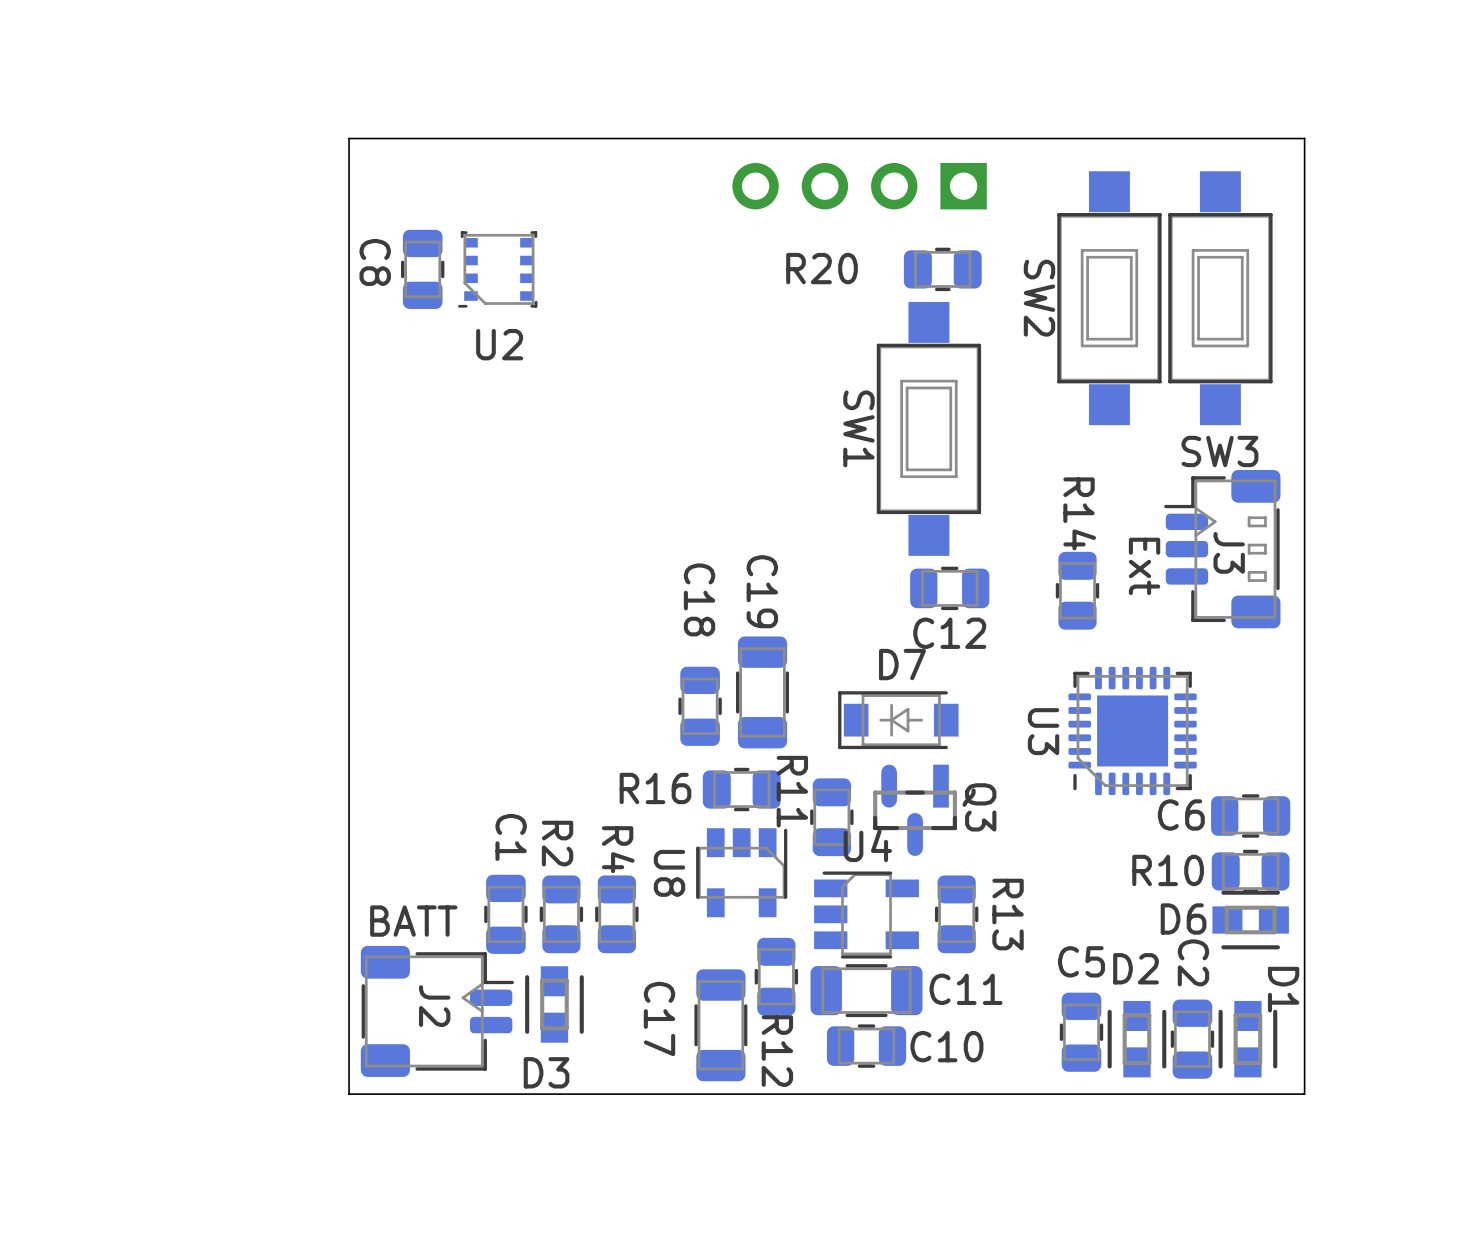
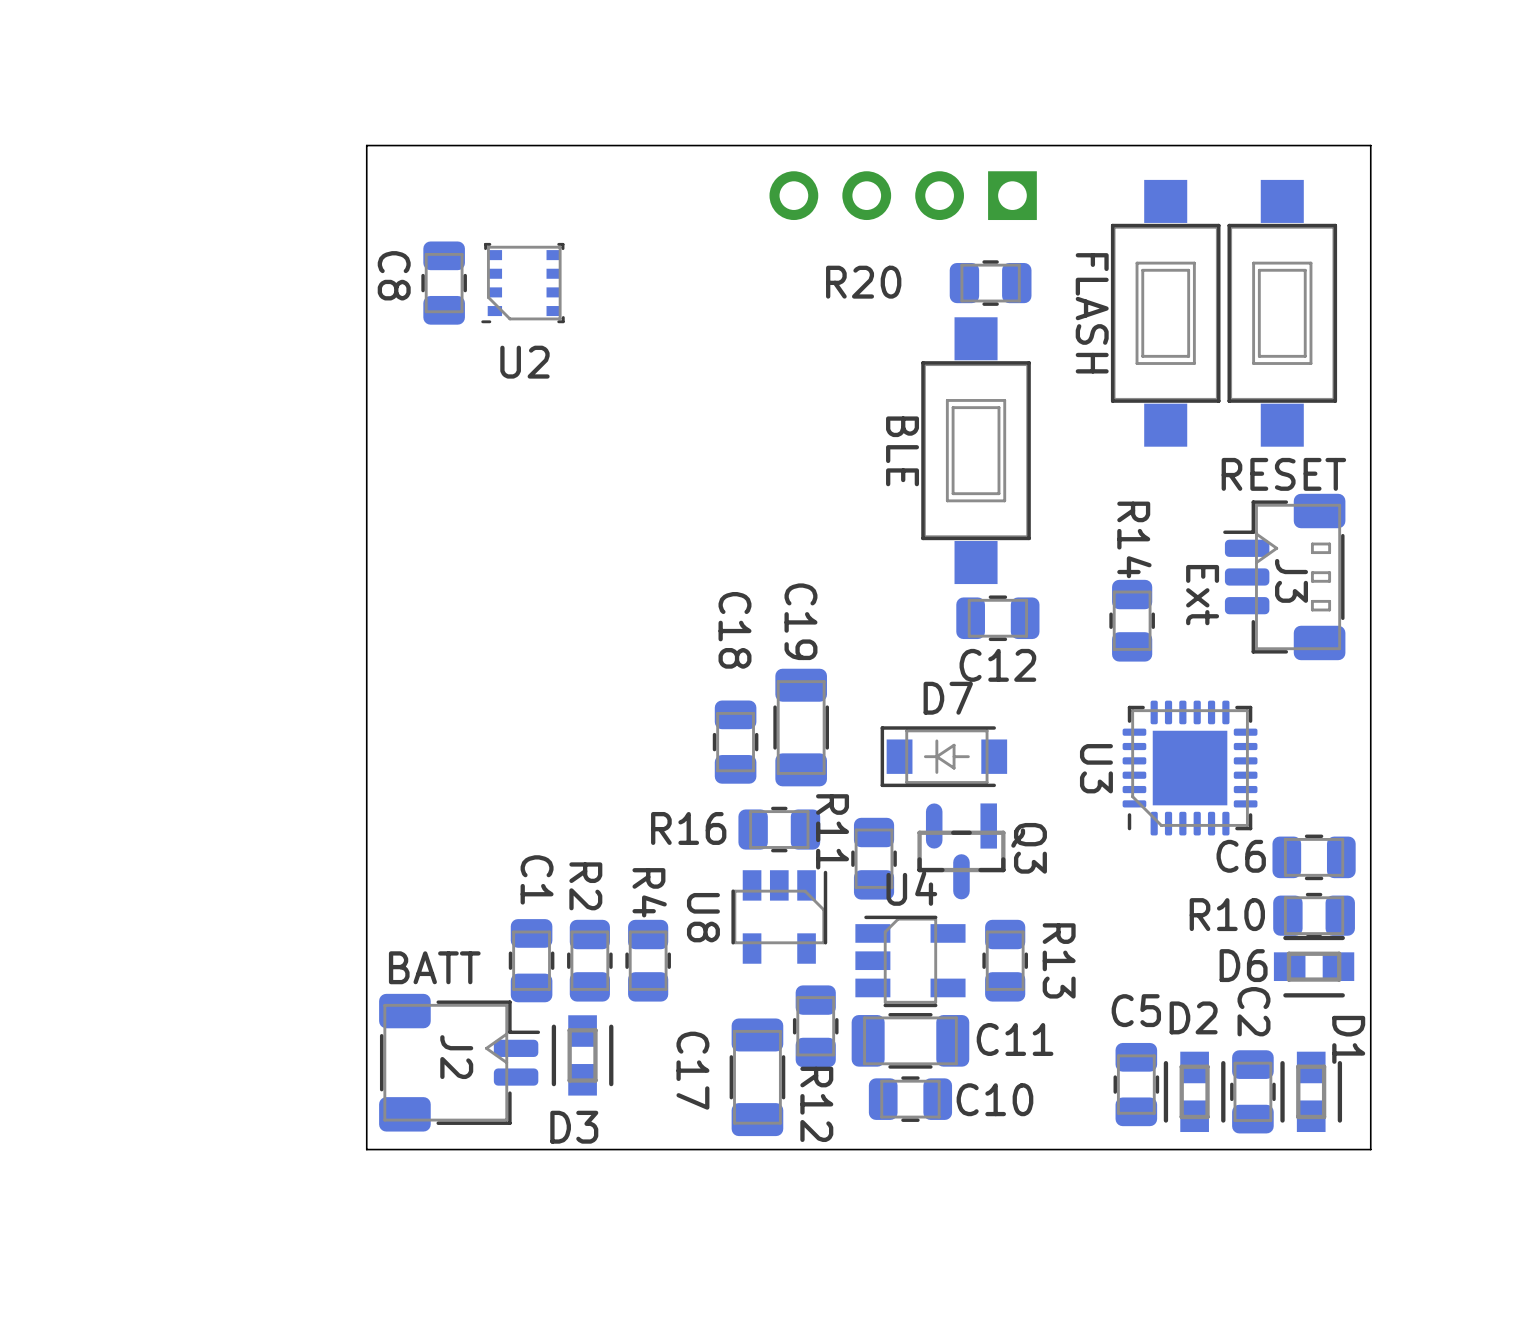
SW2 name: SW2 (1039, 298) -> FLASH (1092, 313)
SW1 name: SW1 (858, 428) -> BLE (902, 451)
SW3 name: SW3 (1219, 451) -> RESET (1283, 474)

